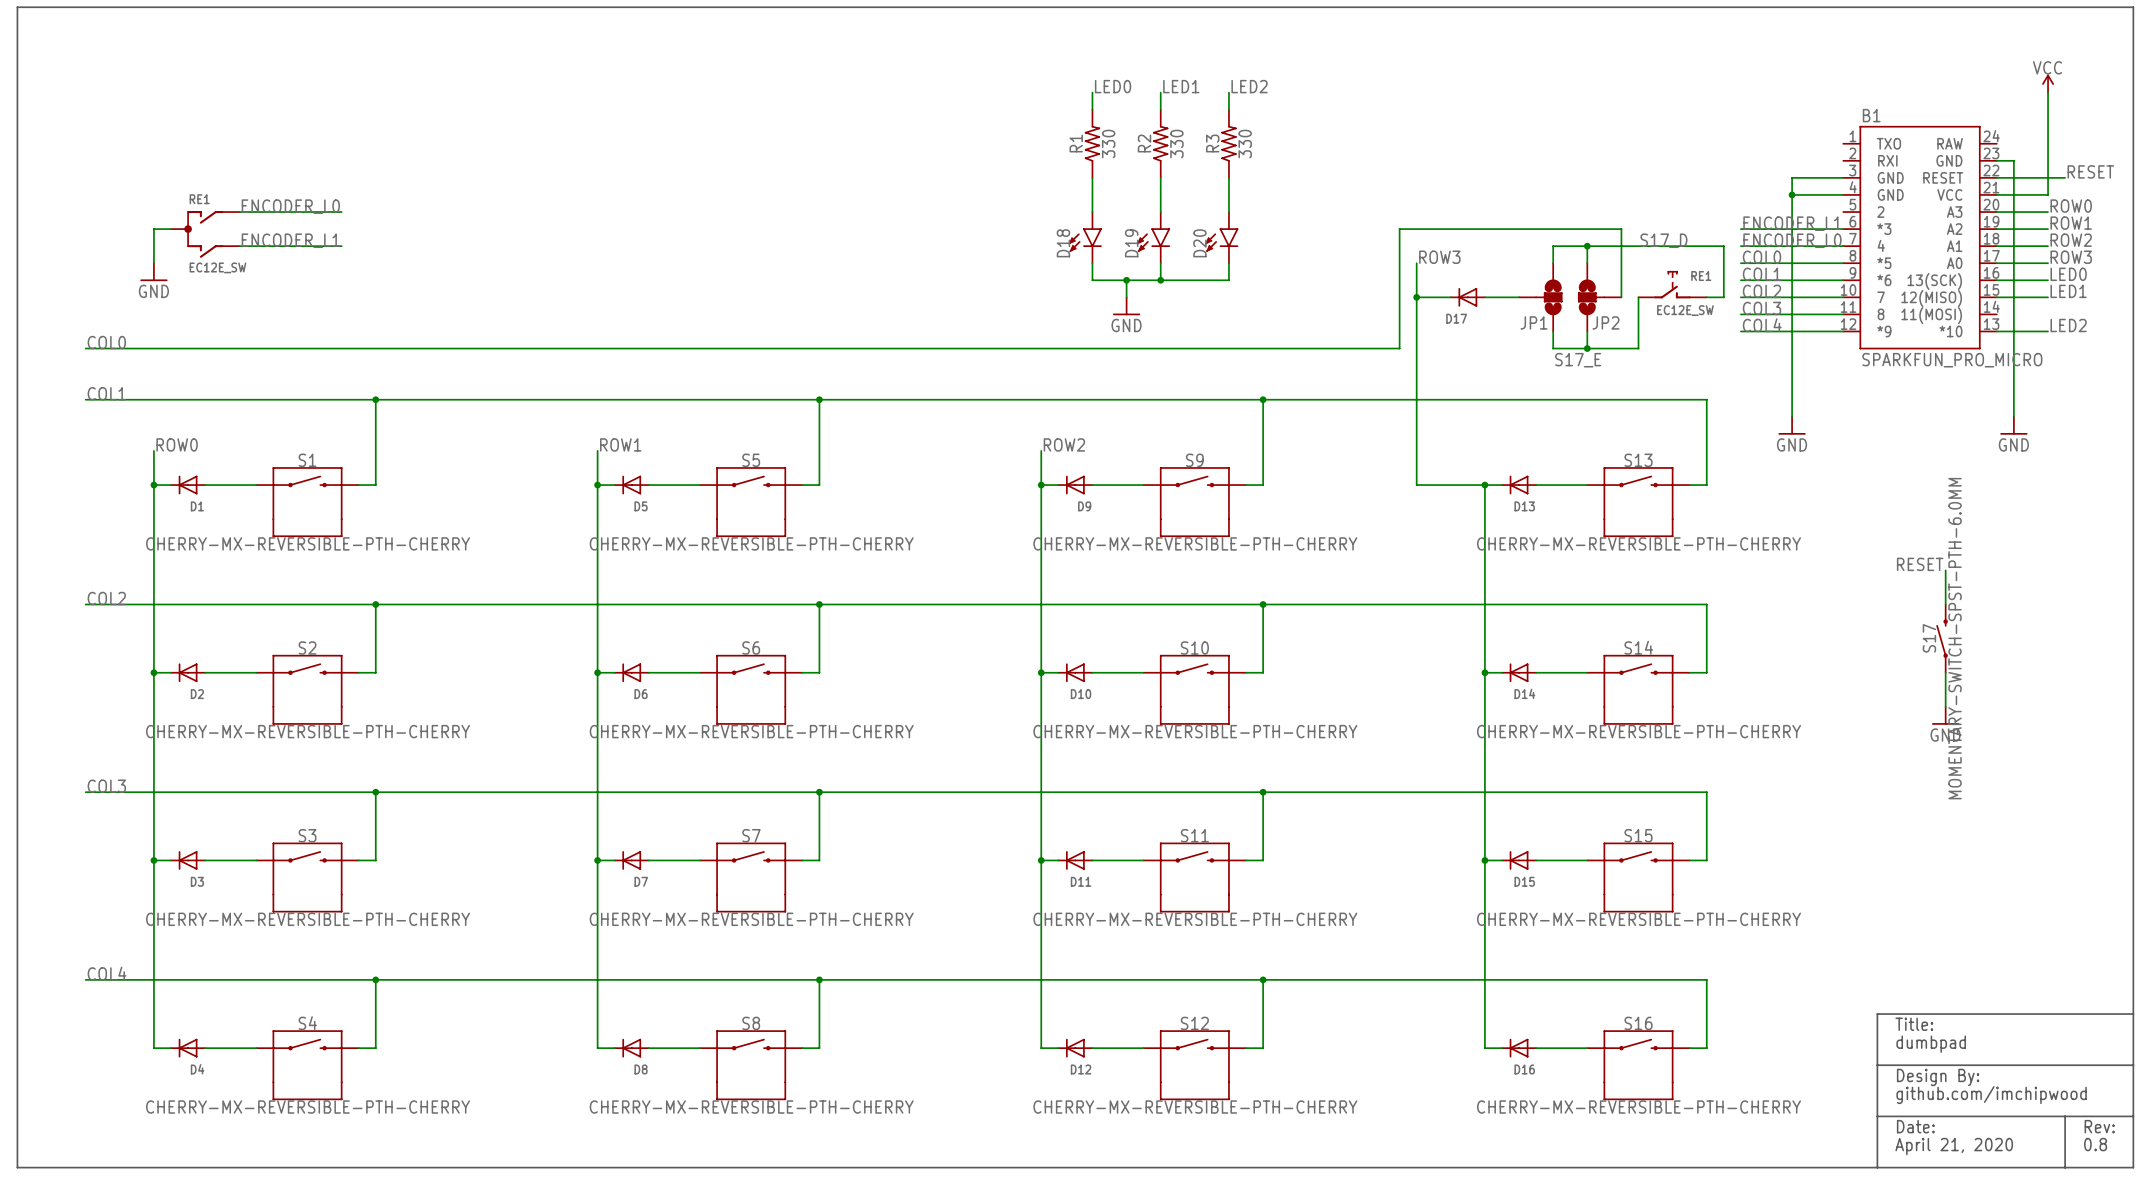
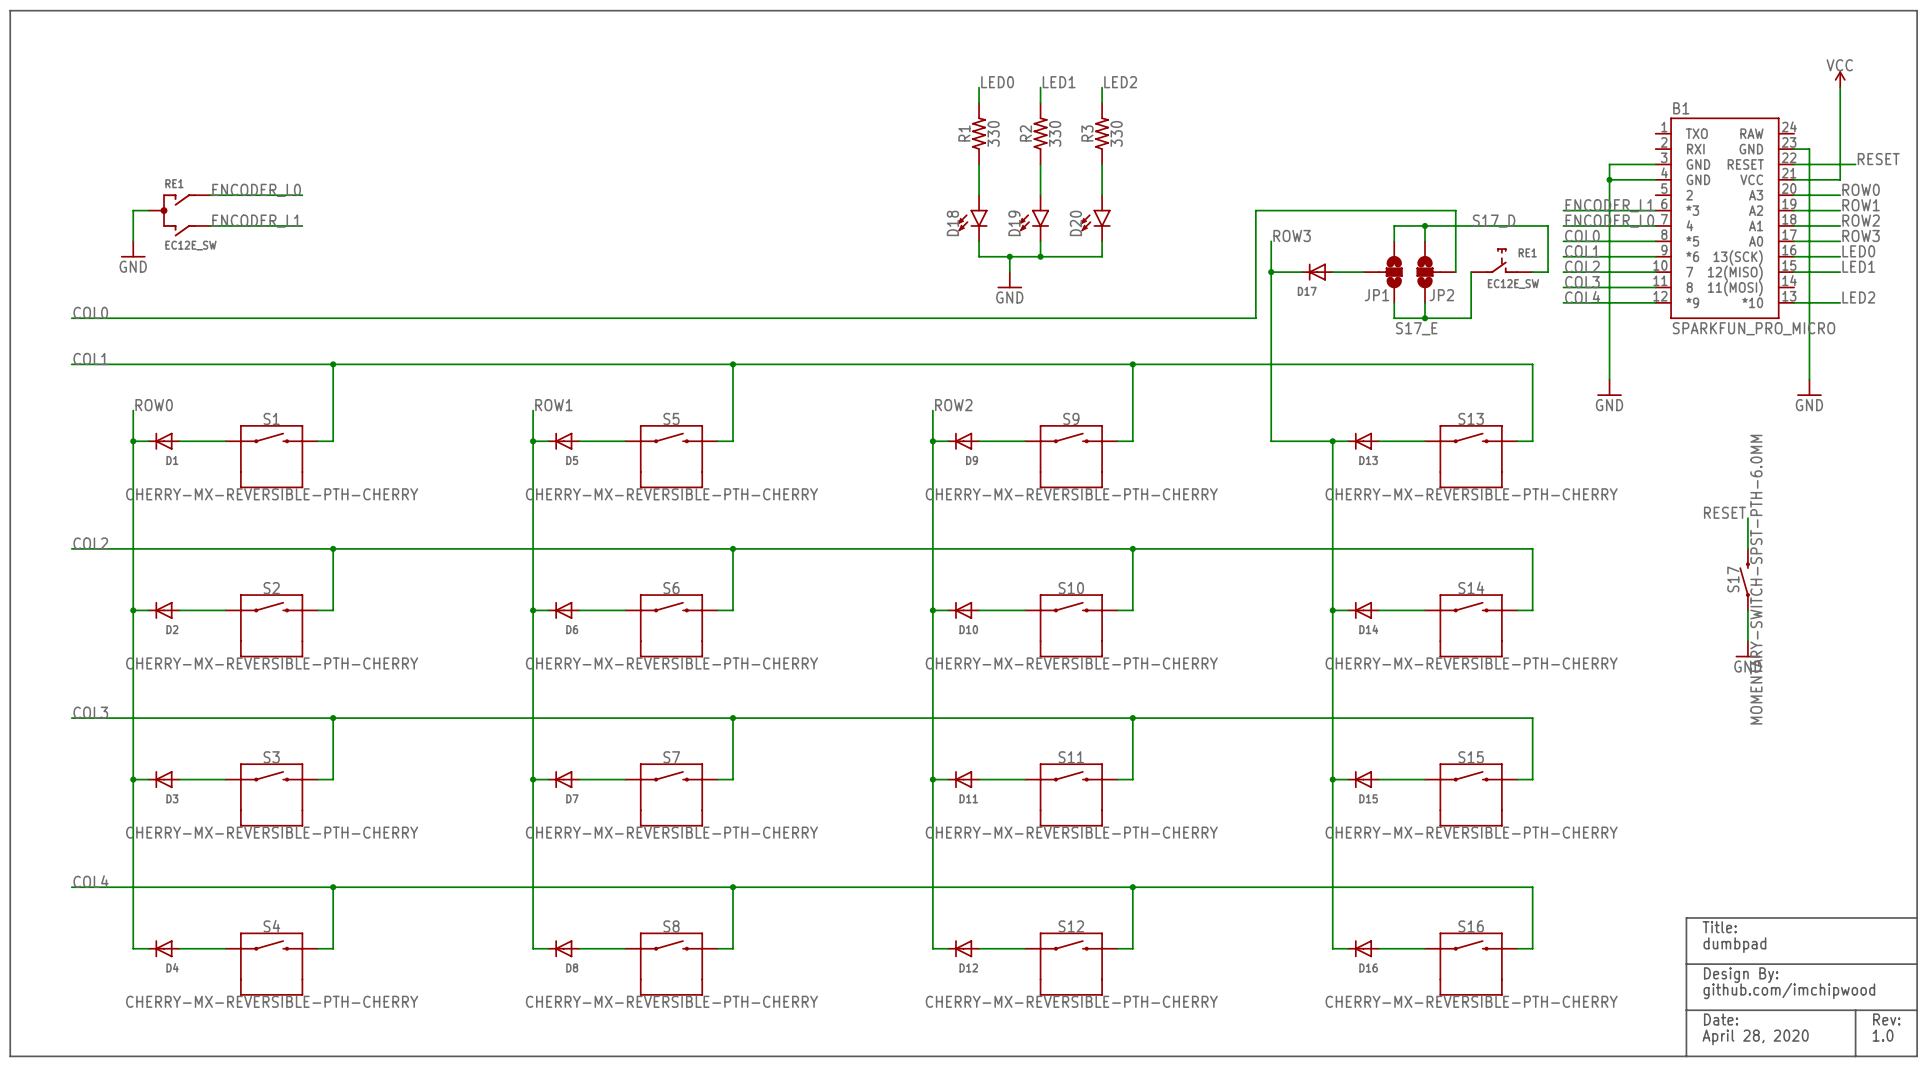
text: 0.8 (2095, 1144) -> 1.0 (1883, 1035)
text: April 21, 2020 (1954, 1146) -> April 28, 2020 (1755, 1037)

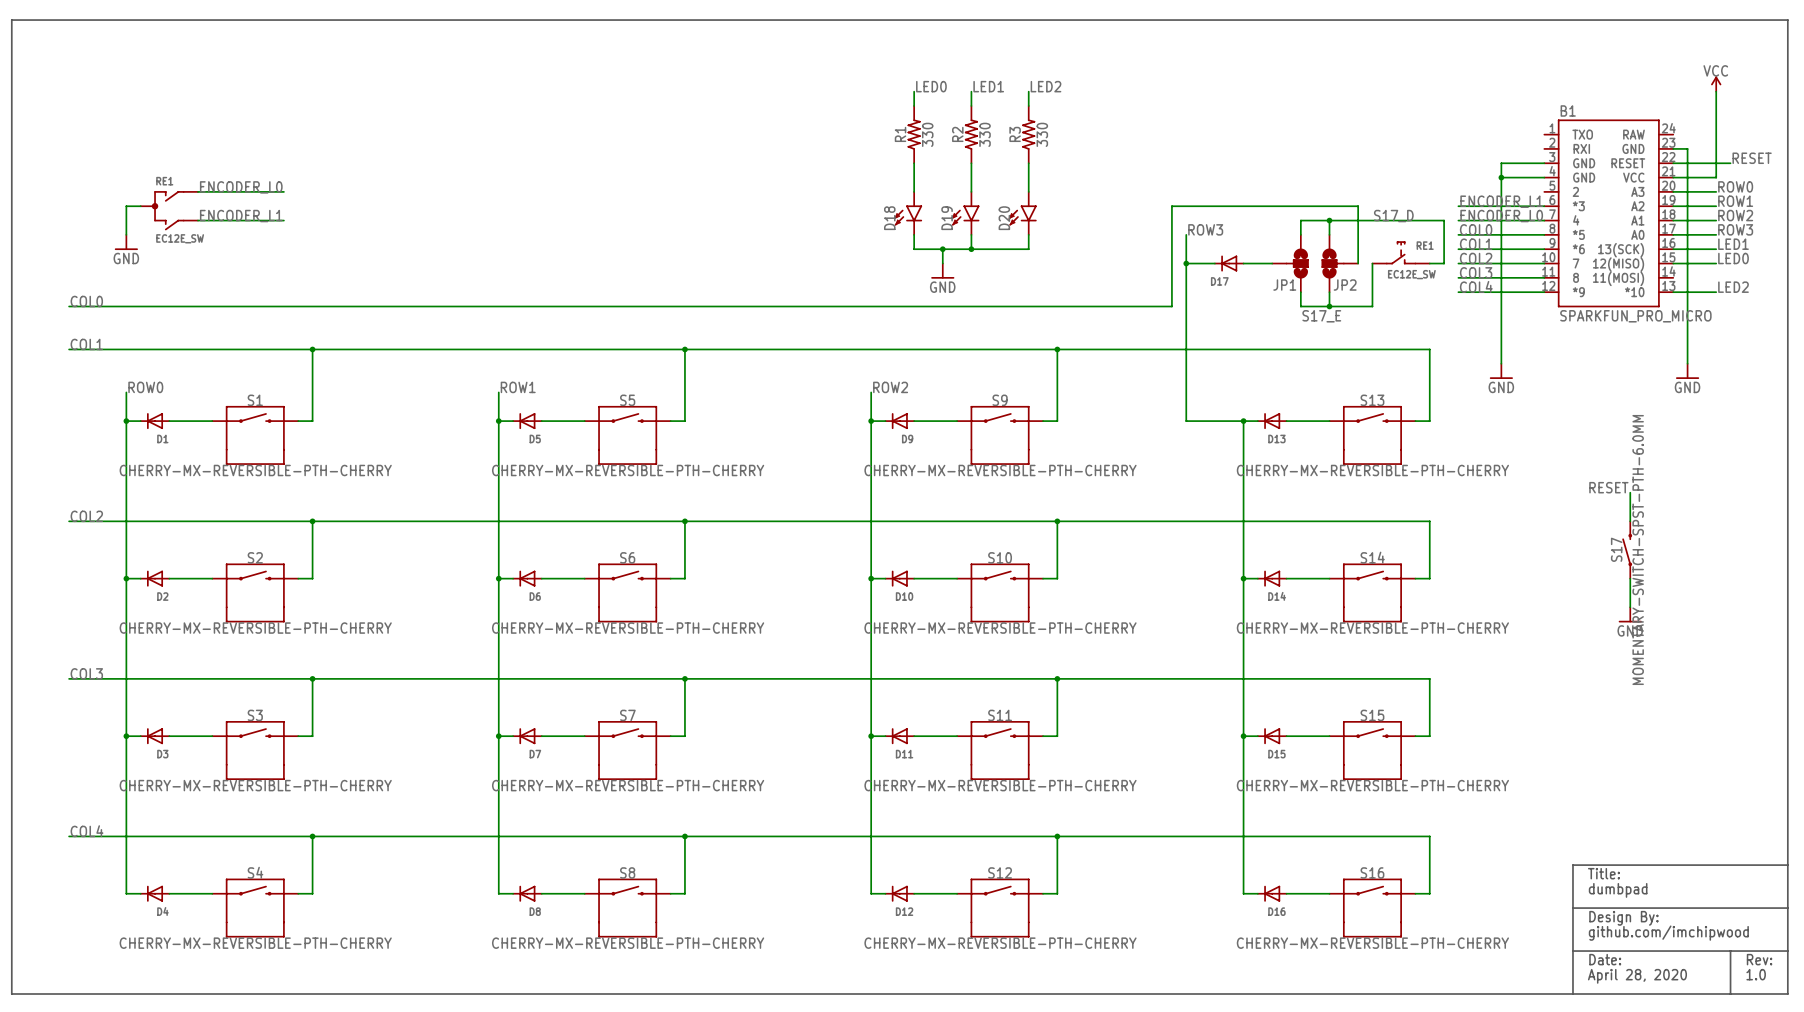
label: LED0 (1858, 251) -> LED1 (1733, 244)
label: LED1 (1858, 266) -> LED0 (1733, 258)

